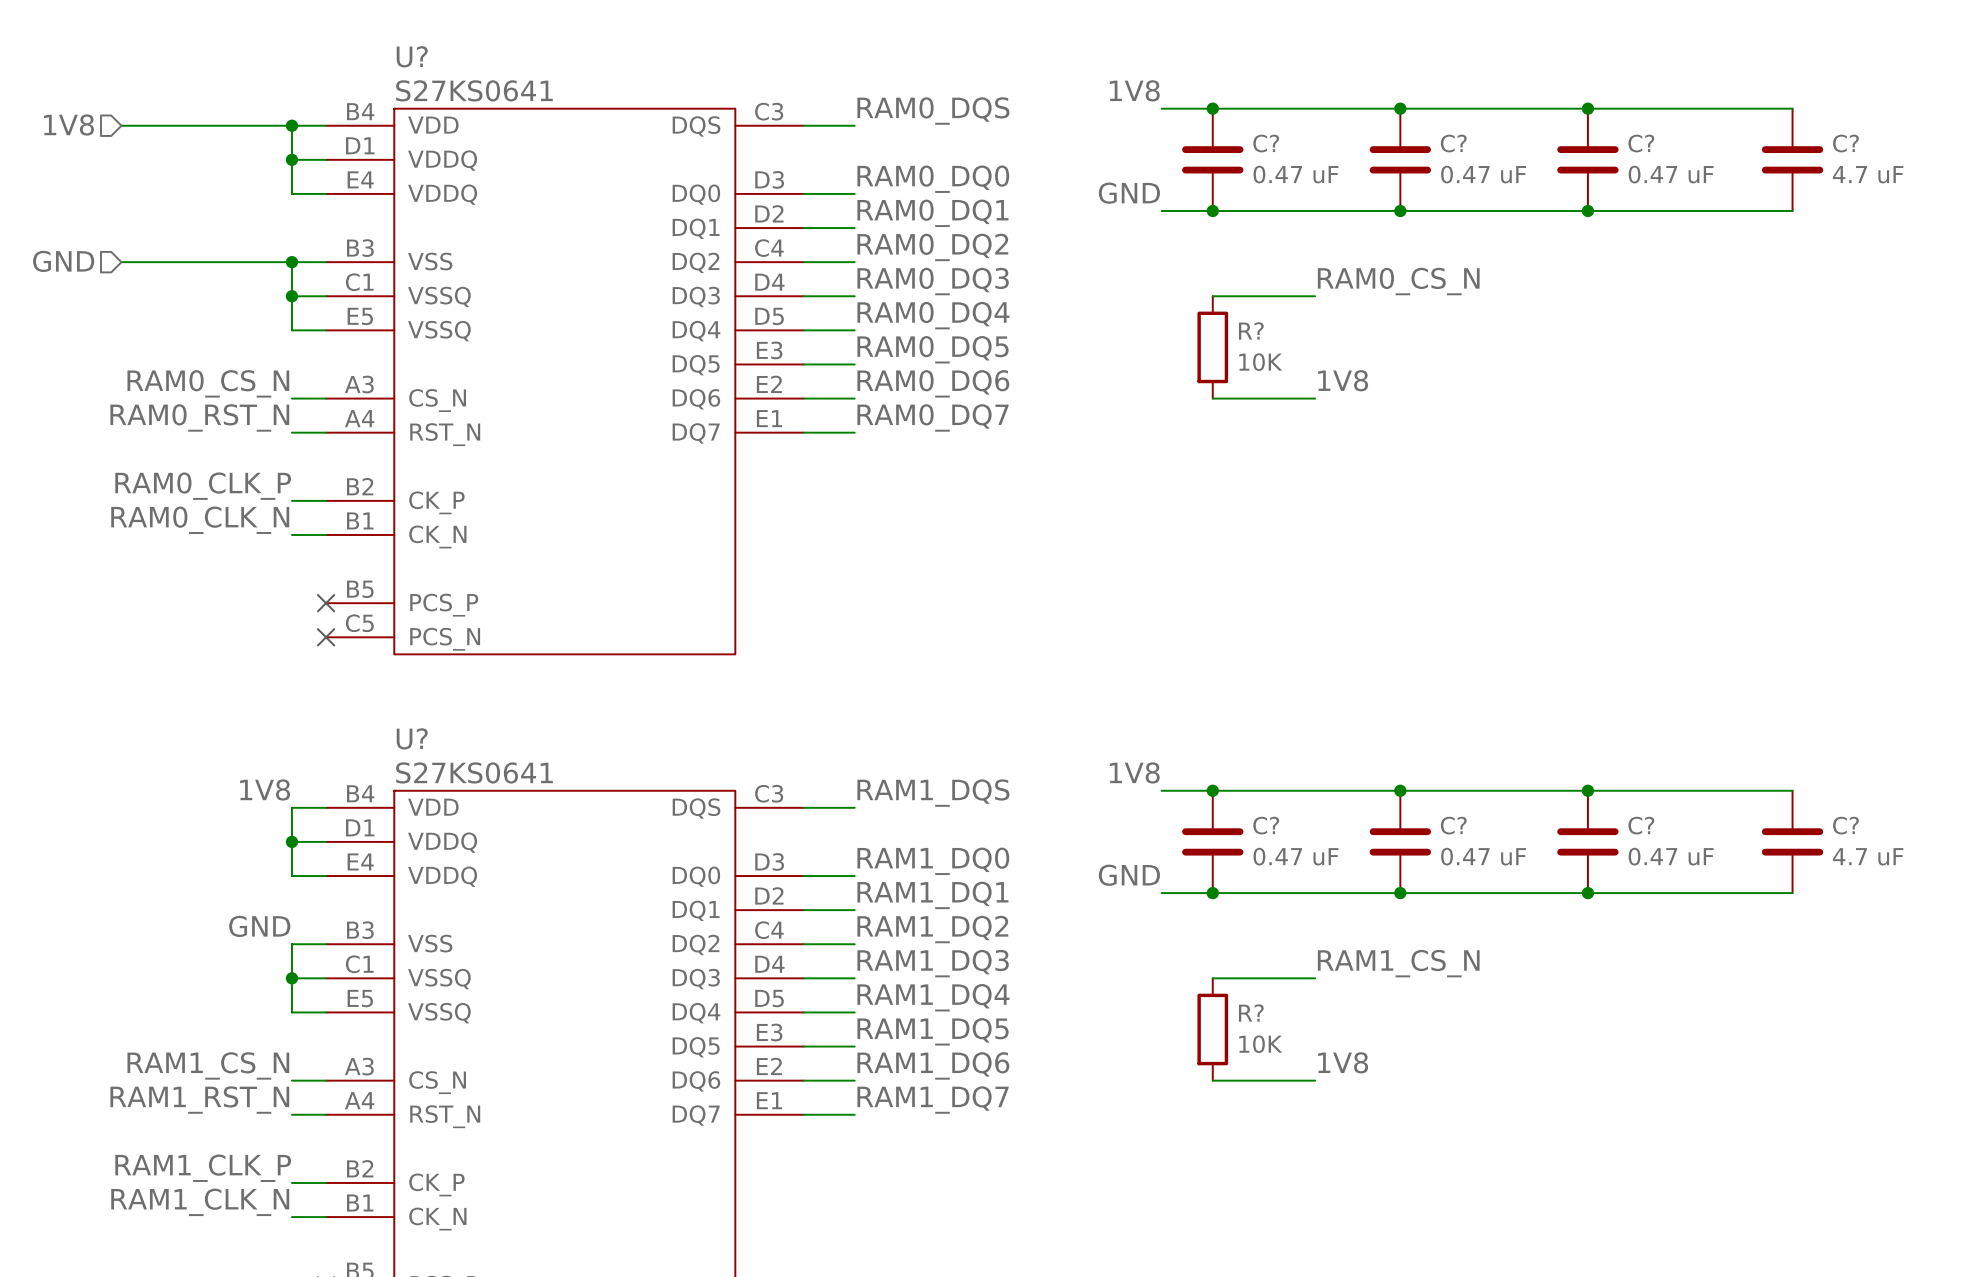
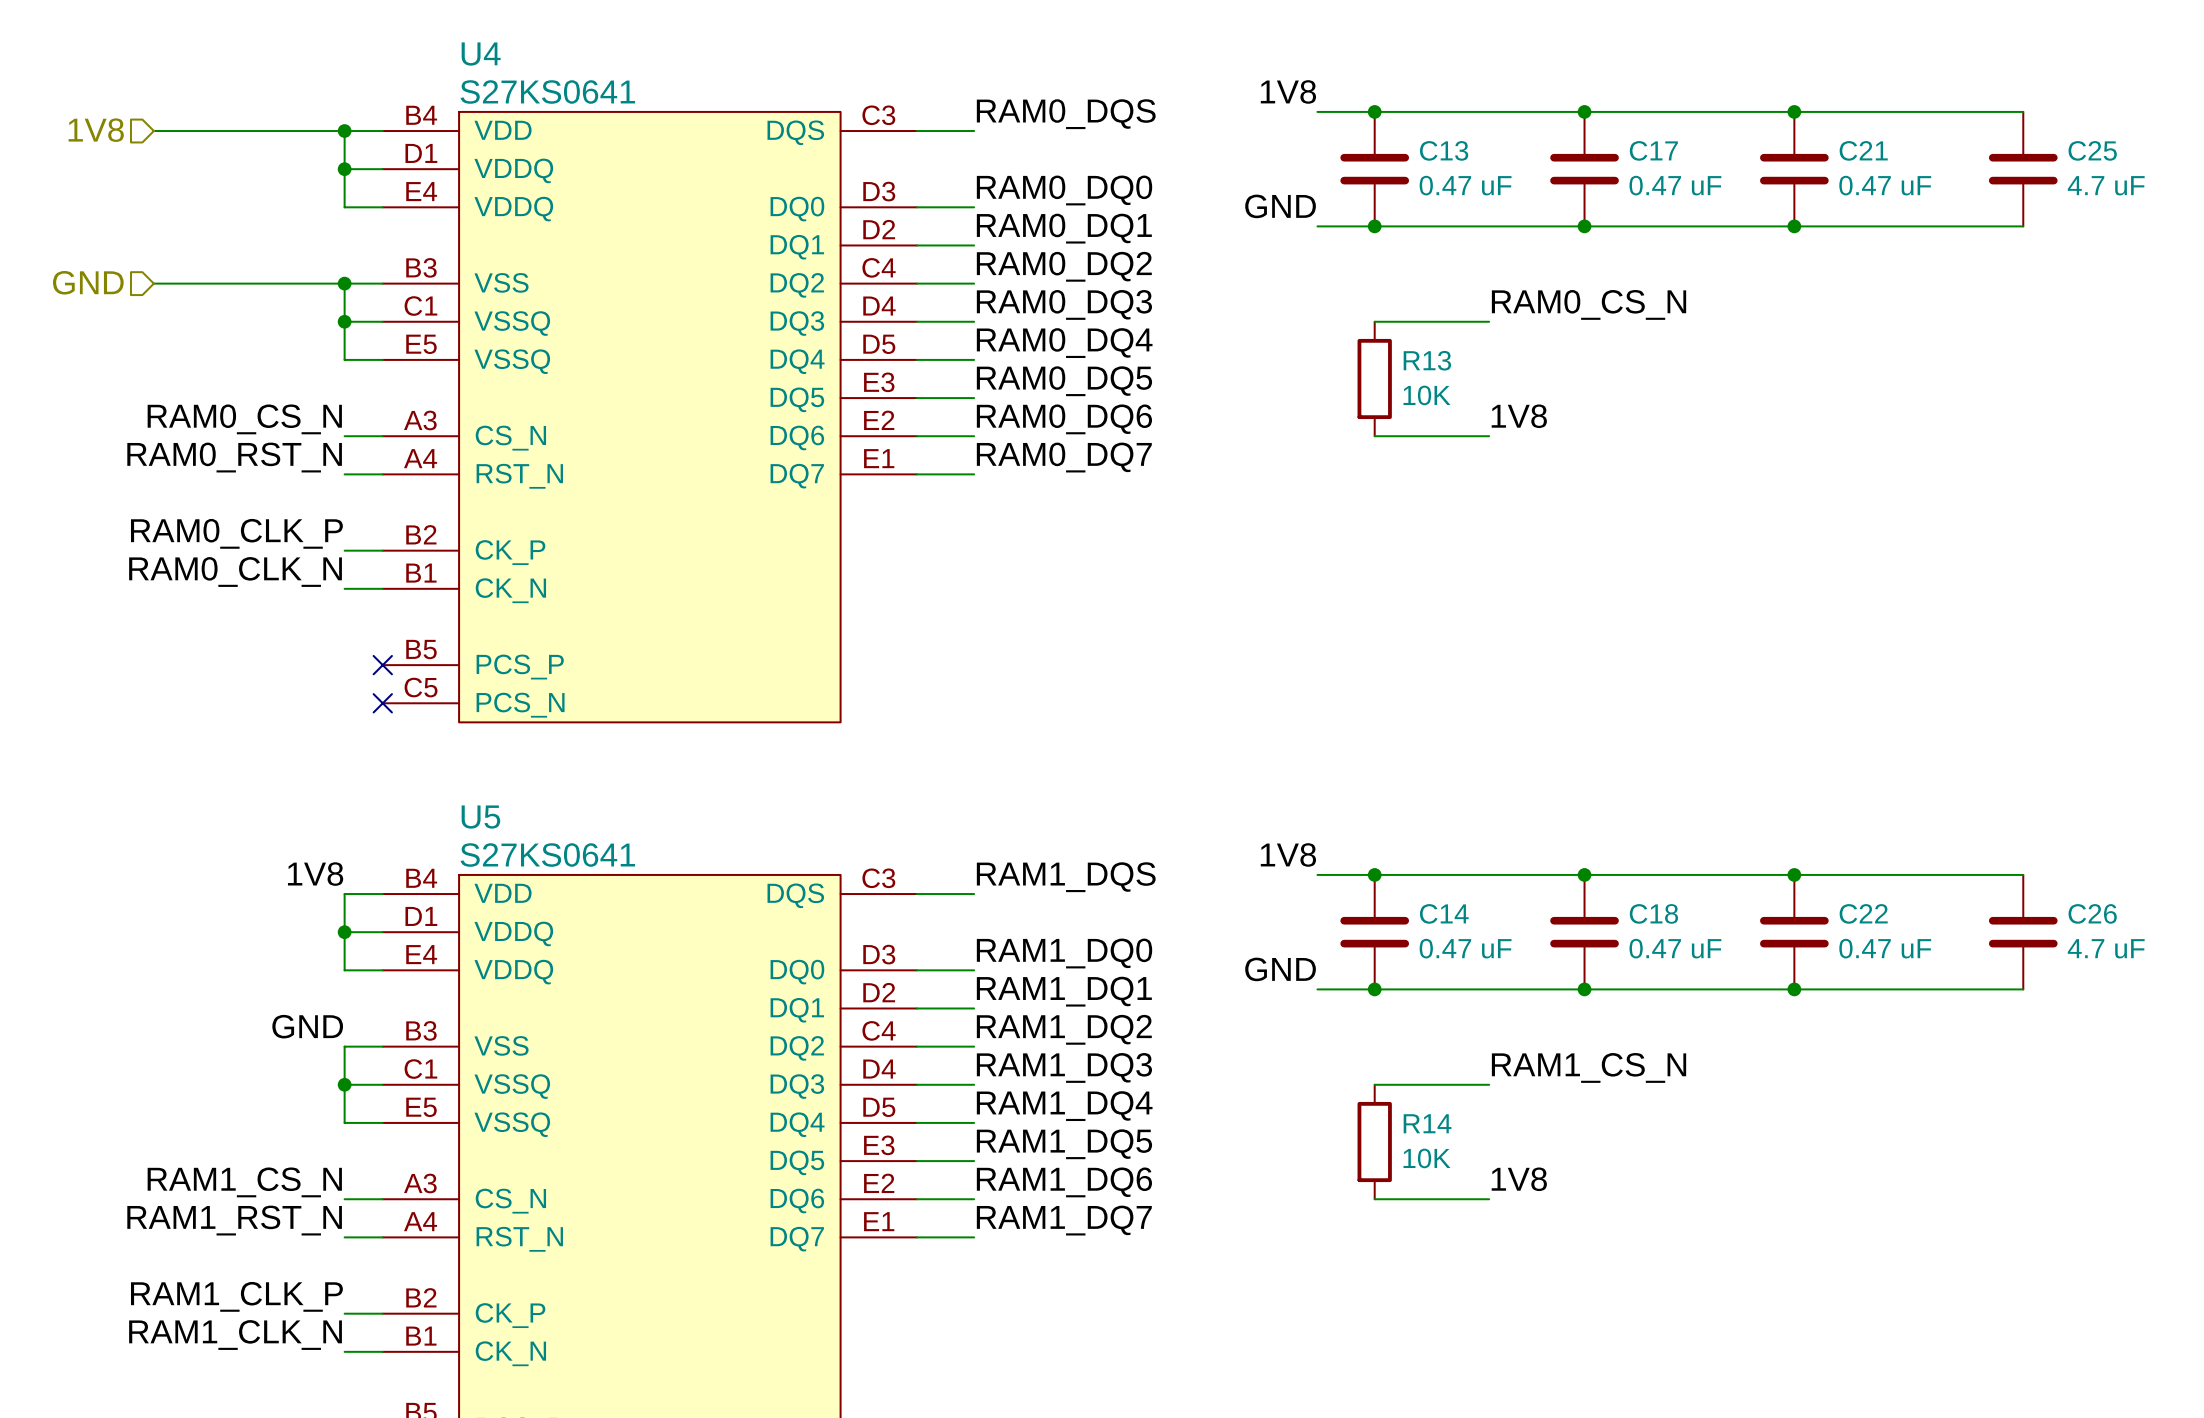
U? name: U? (412, 56) -> U4 (481, 54)
C? name: C? (1266, 143) -> C13 (1444, 150)
C? name: C? (1453, 143) -> C17 (1653, 150)
C? name: C? (1641, 143) -> C21 (1863, 150)
C? name: C? (1845, 143) -> C25 (2092, 150)
R? name: R? (1251, 330) -> R13 (1427, 360)
U? name: U? (412, 738) -> U5 (480, 817)
C? name: C? (1266, 825) -> C14 (1444, 913)
C? name: C? (1453, 825) -> C18 (1653, 913)
C? name: C? (1641, 825) -> C22 (1863, 913)
C? name: C? (1845, 825) -> C26 (2092, 913)
R? name: R? (1251, 1013) -> R14 (1427, 1123)

